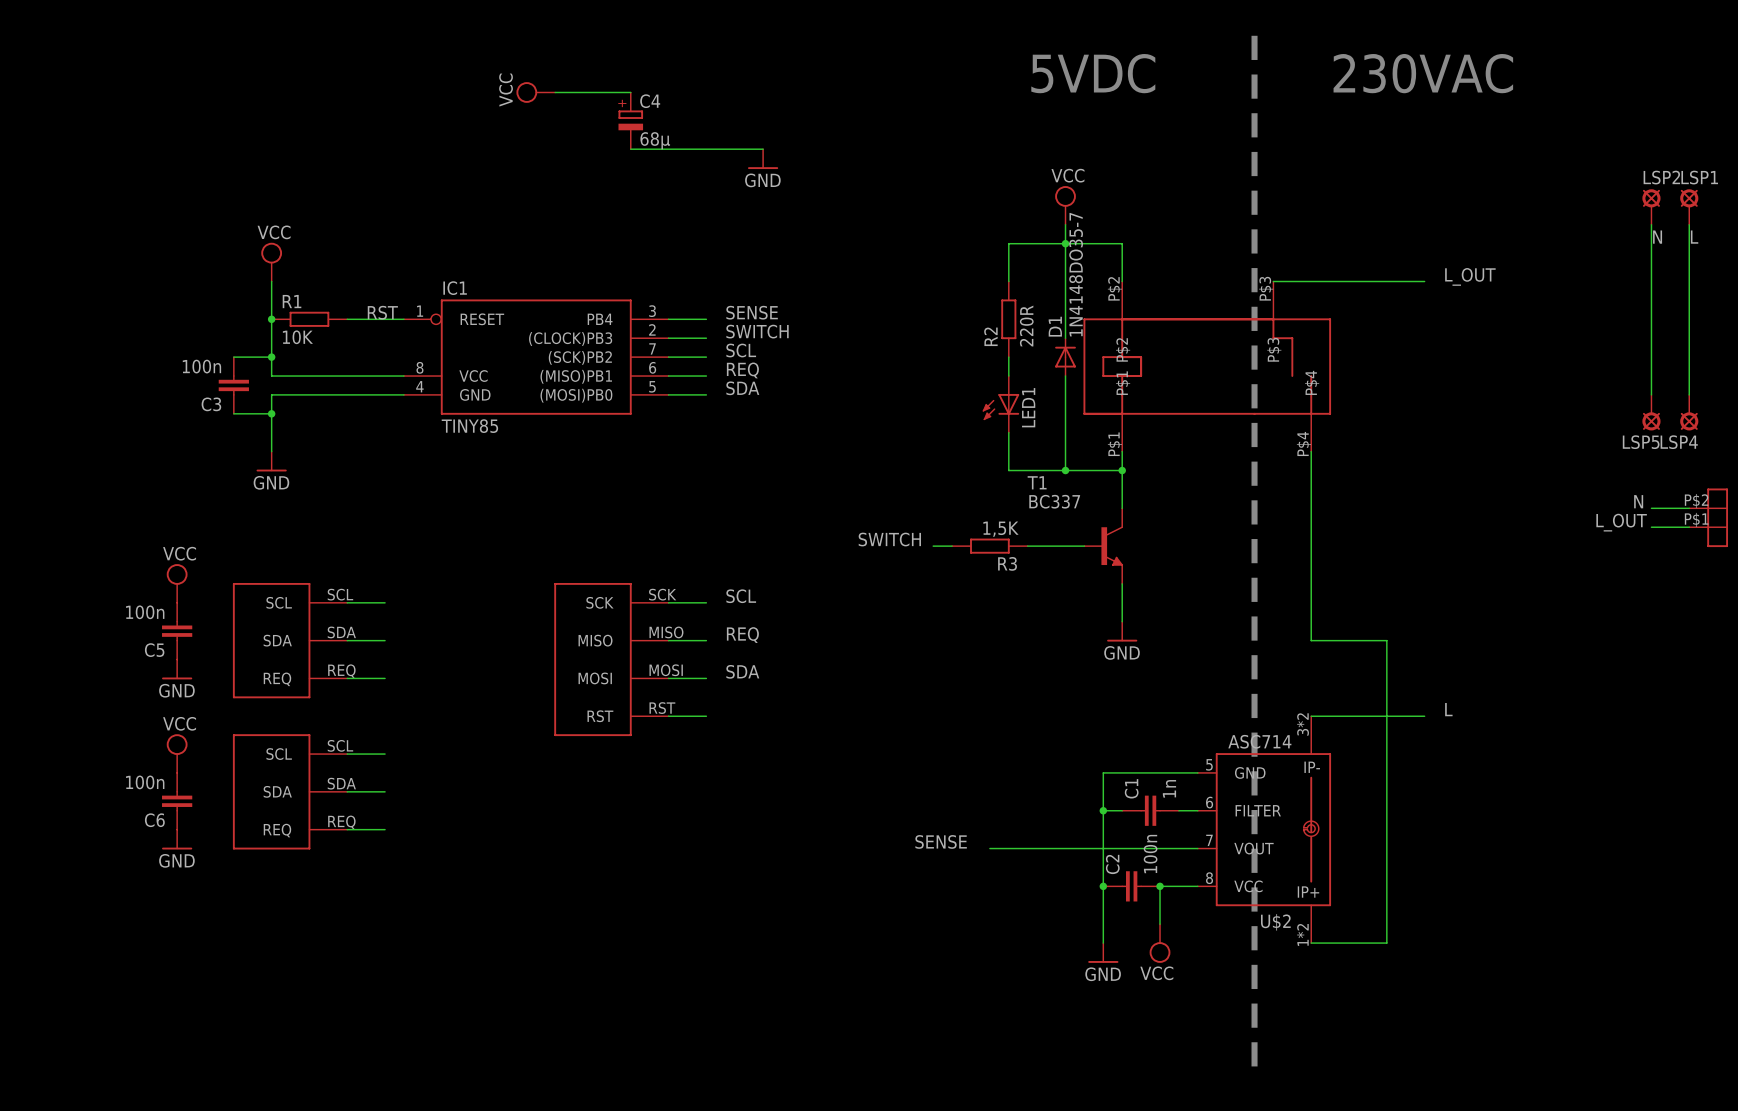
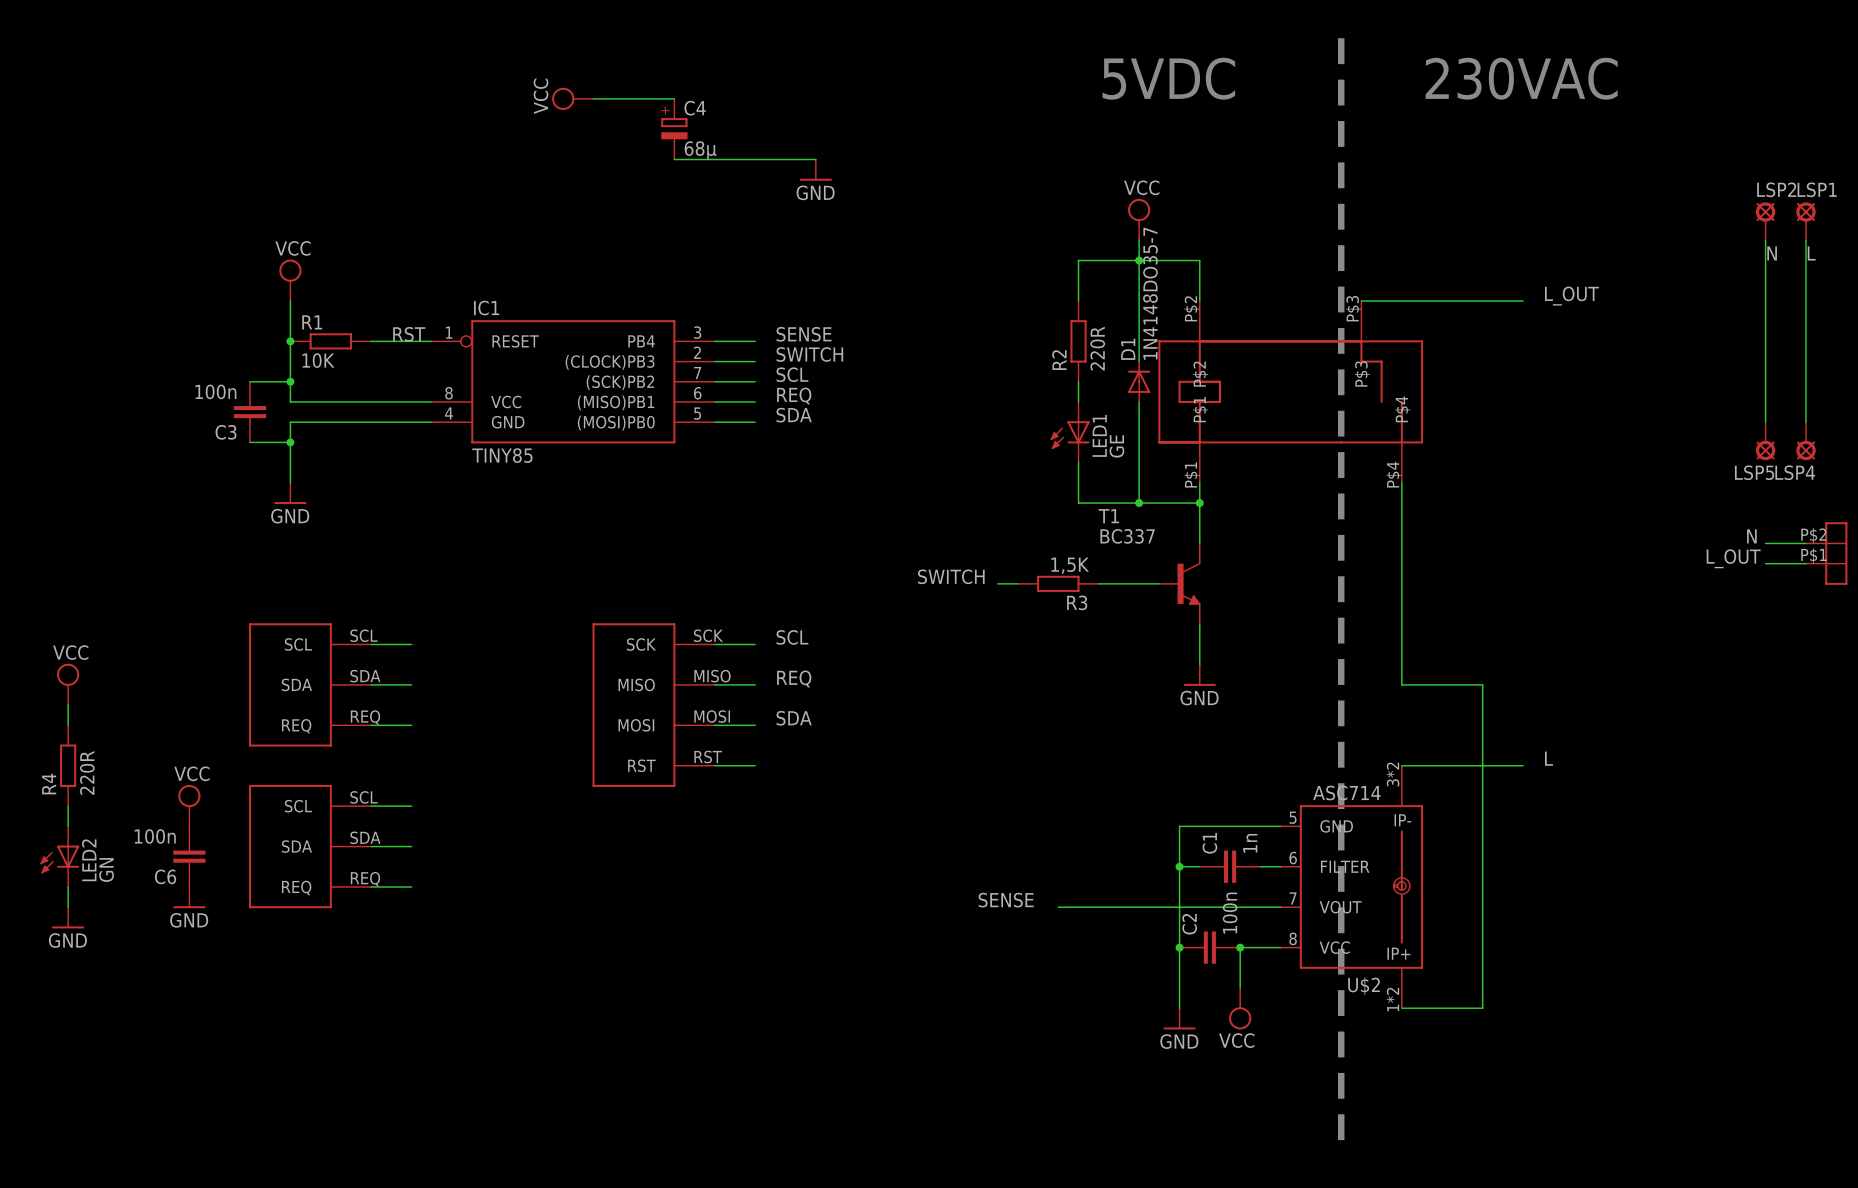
LED1 value: none -> GE (1116, 446)
power symbol position: VCC (177, 583) -> VCC (68, 684)
C5: 100n (177, 631) -> none
wire: none -> (68, 705) (68, 725)
power symbol: GND (177, 669) -> none
R4: none -> 220R (68, 765)
wire: none -> (68, 806) (68, 826)
LED2: none -> GN (59, 856)
wire: none -> (68, 886) (68, 907)
power symbol: none -> GND (68, 917)

